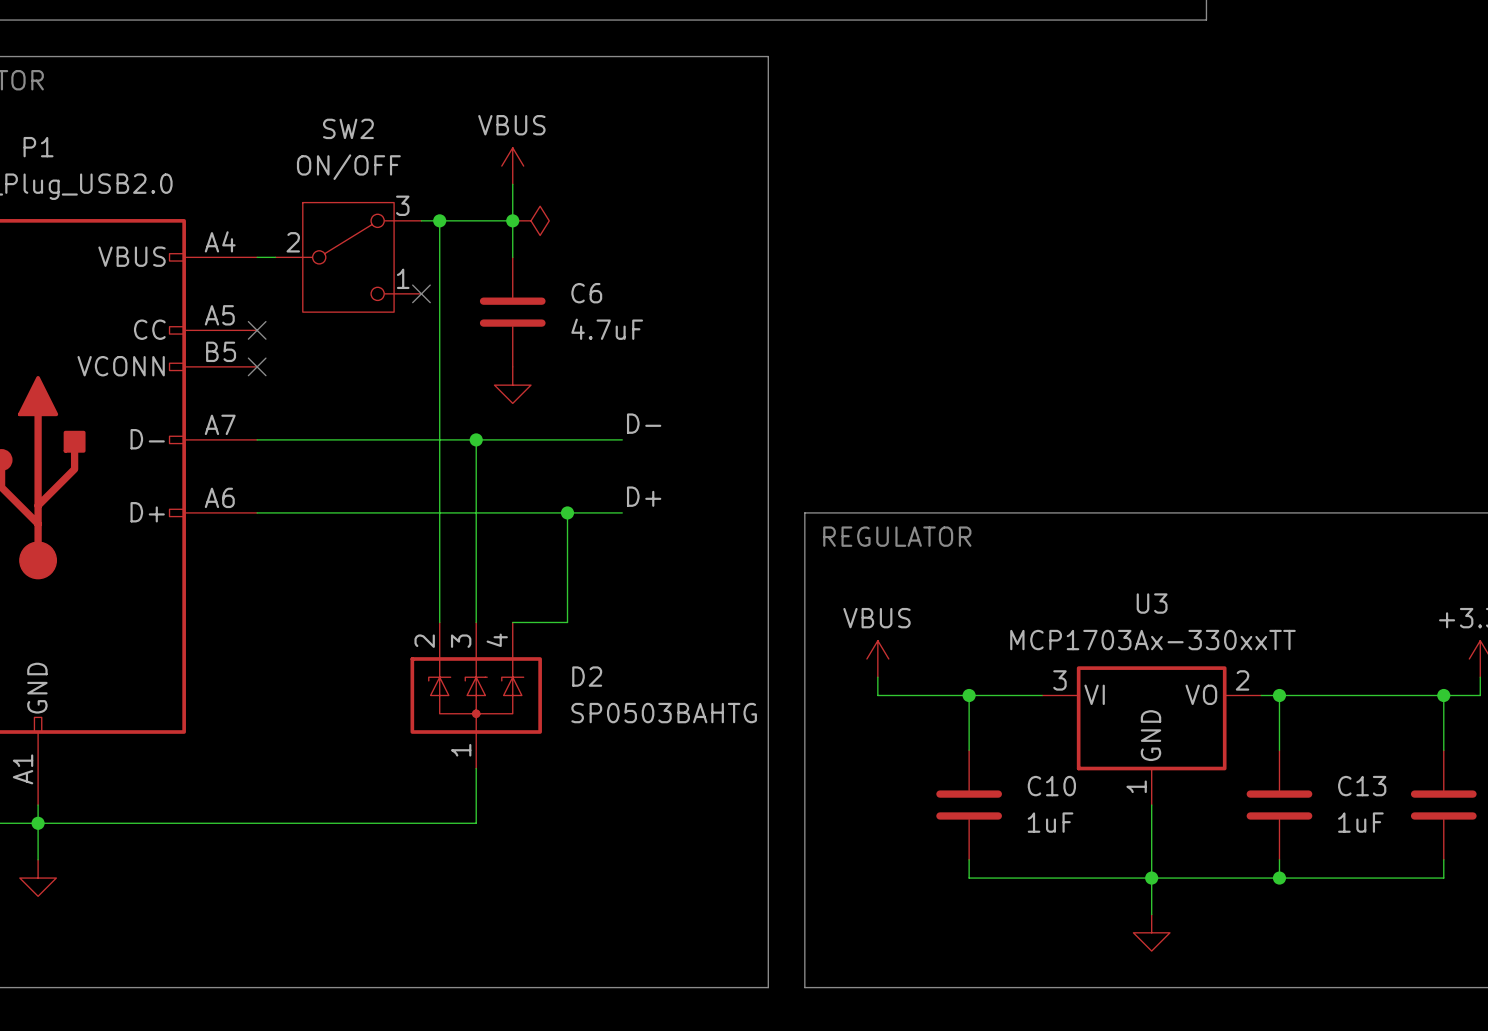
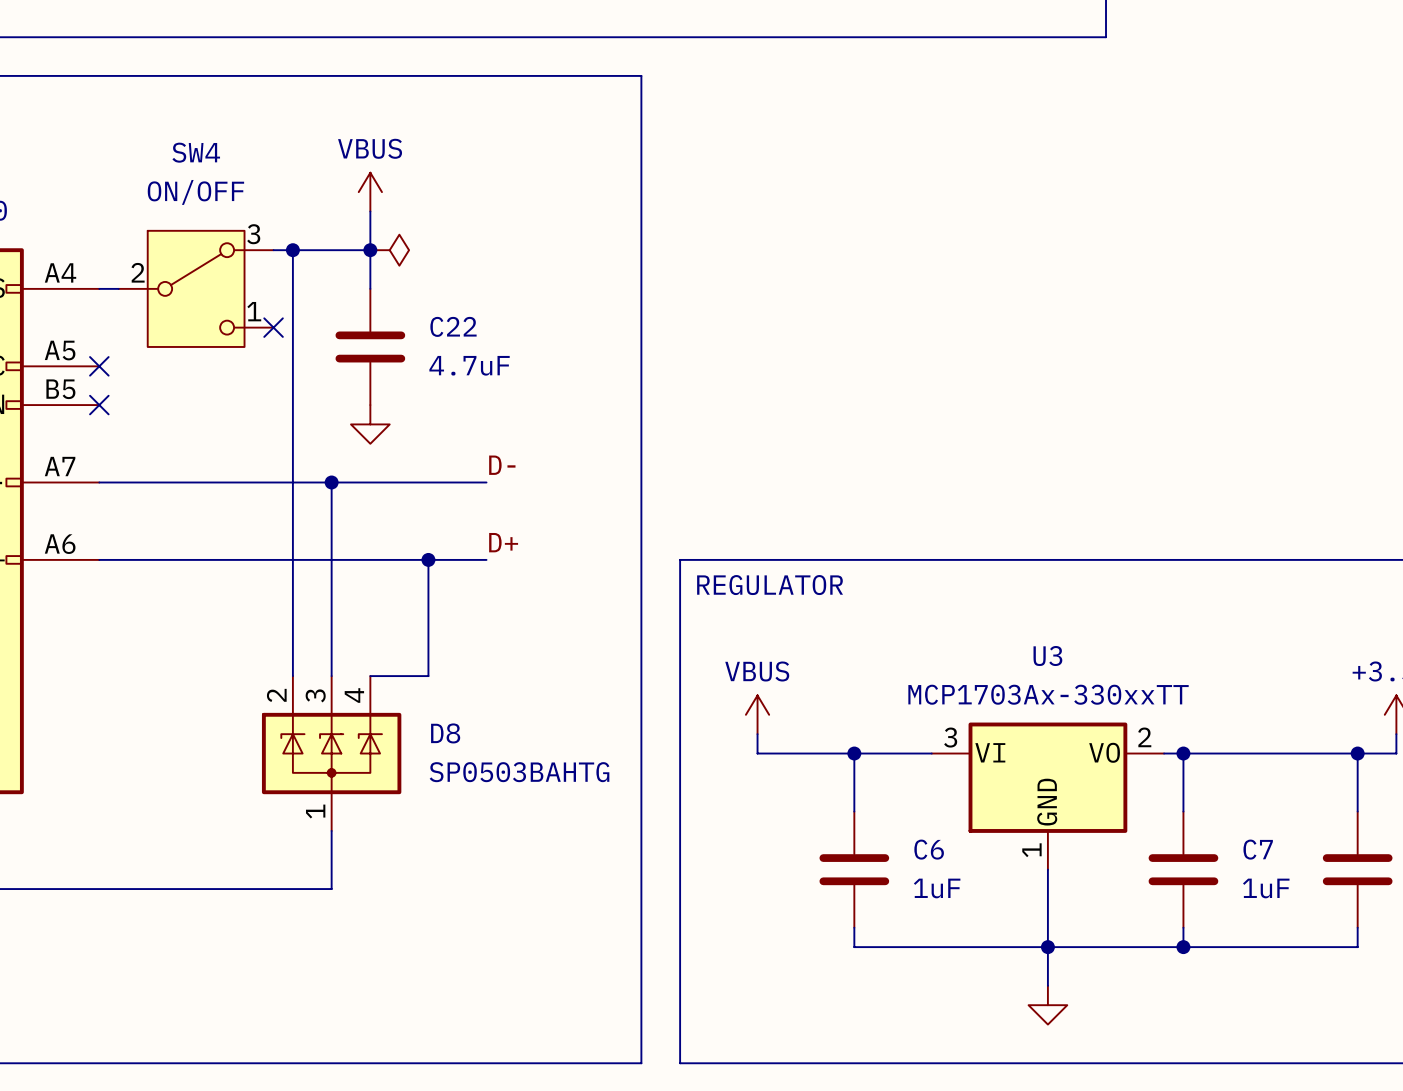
SW2 name: SW2 (348, 128) -> SW4 (196, 152)
C6 name: C6 (586, 293) -> C22 (453, 326)
D2 name: D2 (587, 676) -> D8 (445, 733)
C10 name: C10 (1051, 786) -> C6 (929, 849)
C13 name: C13 (1362, 786) -> C7 (1258, 849)

